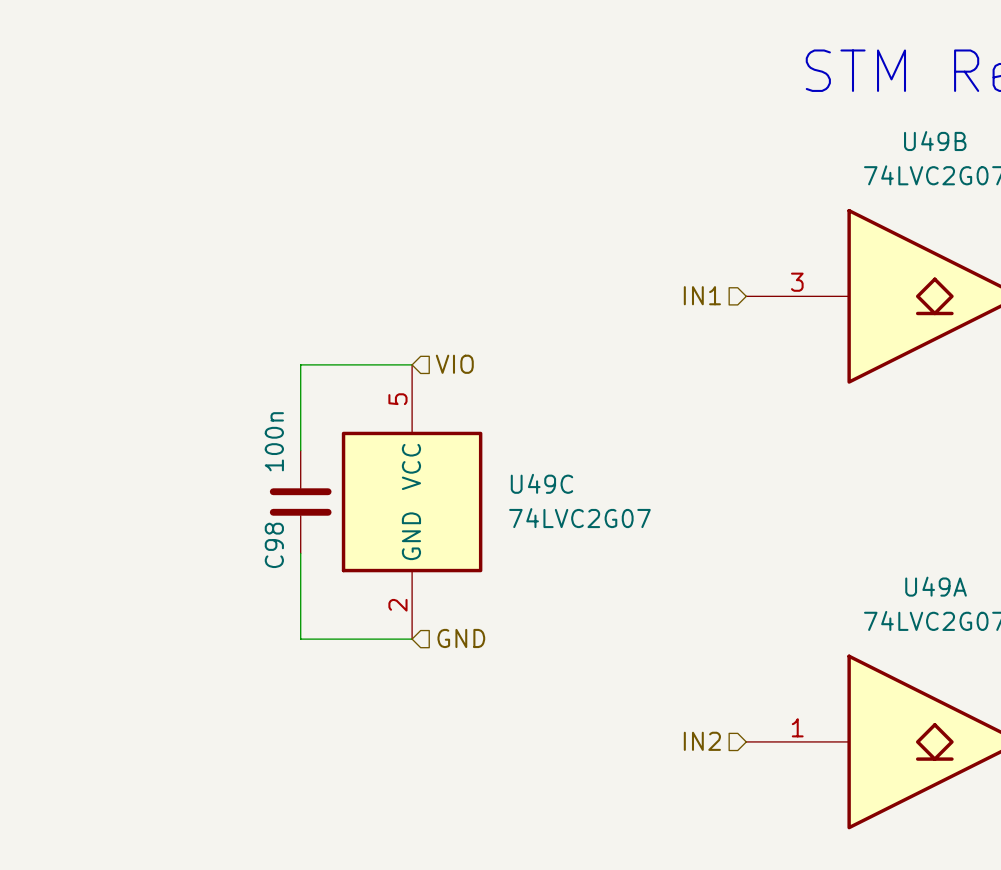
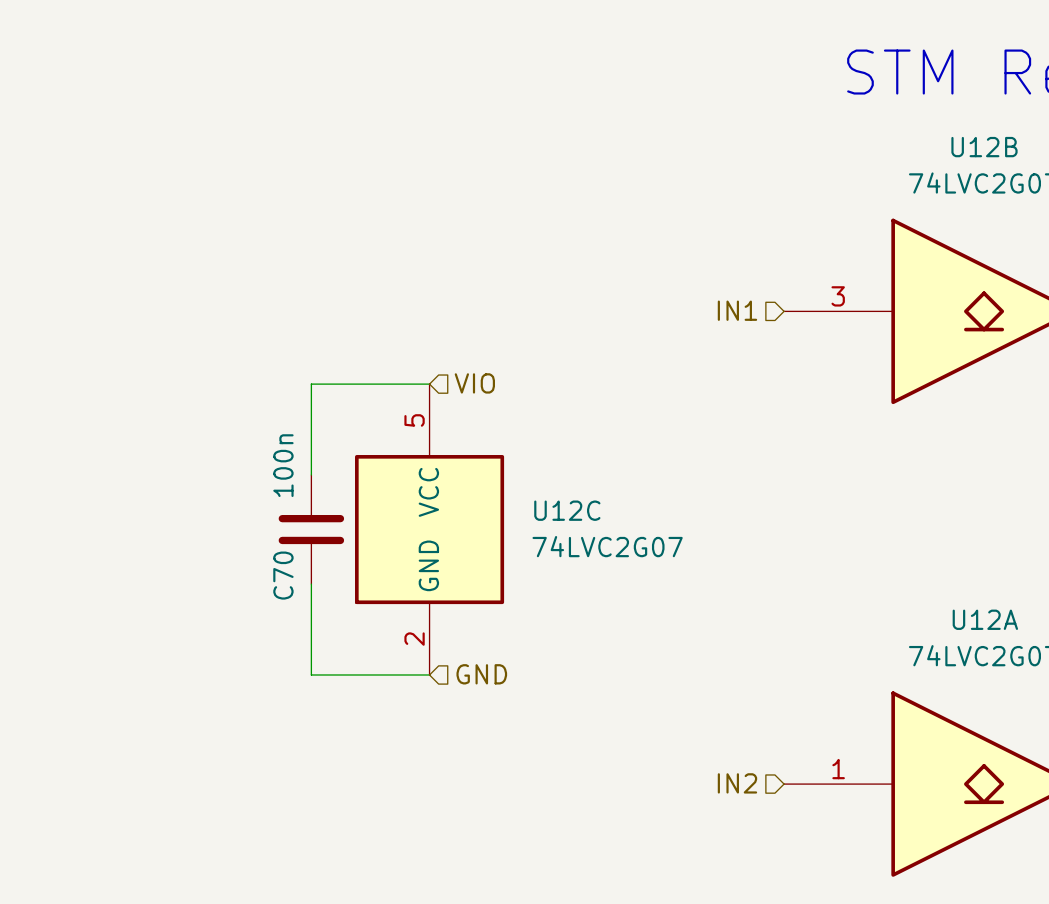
U49B name: U49B (935, 141) -> U12B (984, 147)
U49C name: U49C (541, 483) -> U12C (567, 510)
C98 name: C98 (274, 545) -> C70 (283, 575)
U49A name: U49A (936, 586) -> U12A (985, 619)

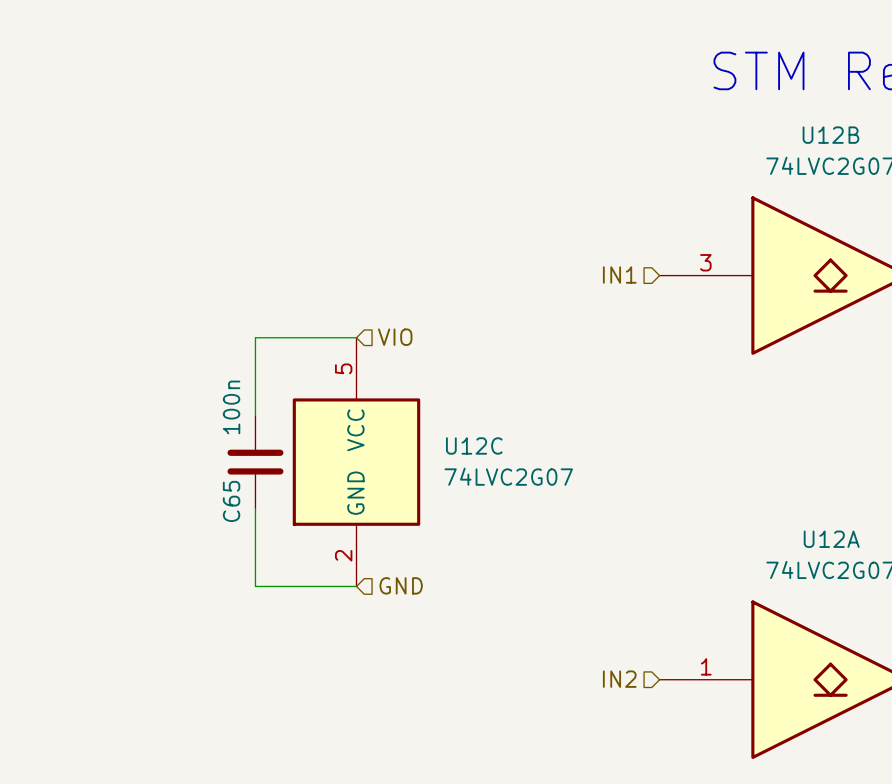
C70 name: C70 (283, 575) -> C65 (231, 501)

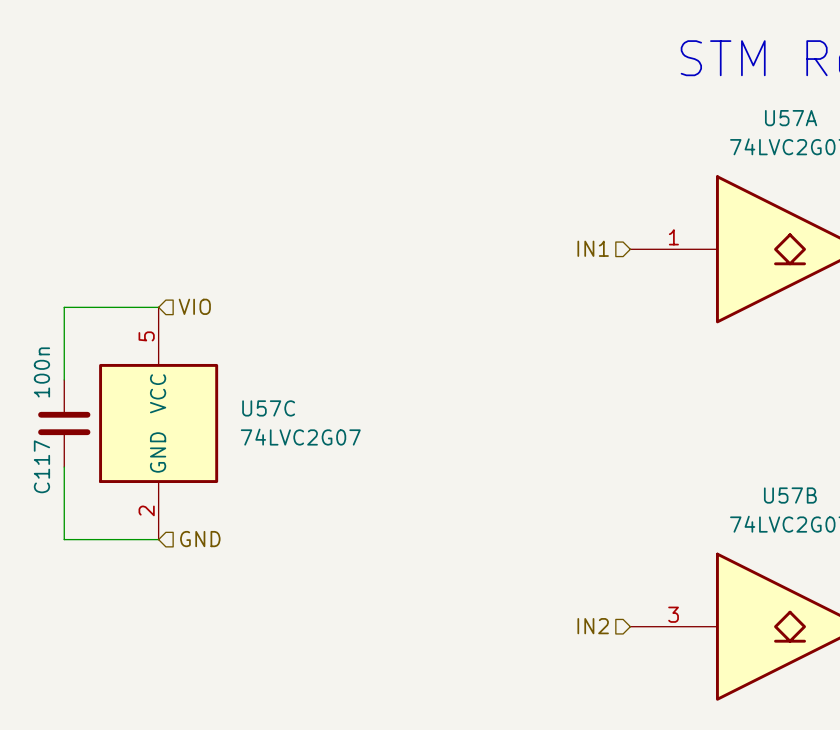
U12B name: U12B (830, 135) -> U57A (791, 118)
U12B pin number: 3 (705, 262) -> 1 (673, 237)
wire: (356, 337) (255, 337) (255, 415) -> (158, 307) (64, 307) (64, 379)
hierarchical label position: VIO (395, 337) -> VIO (194, 306)
C117: none -> 100n (64, 423)
U57C: none -> 74LVC2G07 (158, 423)
C65: 100n (255, 462) -> none
U12C: 74LVC2G07 (356, 462) -> none
wire: (255, 508) (255, 586) (356, 586) -> (64, 467) (64, 539) (158, 539)
U12A name: U12A (831, 539) -> U57B (790, 495)
hierarchical label position: GND (401, 585) -> GND (200, 539)
U12A pin number: 1 (706, 666) -> 3 (673, 614)

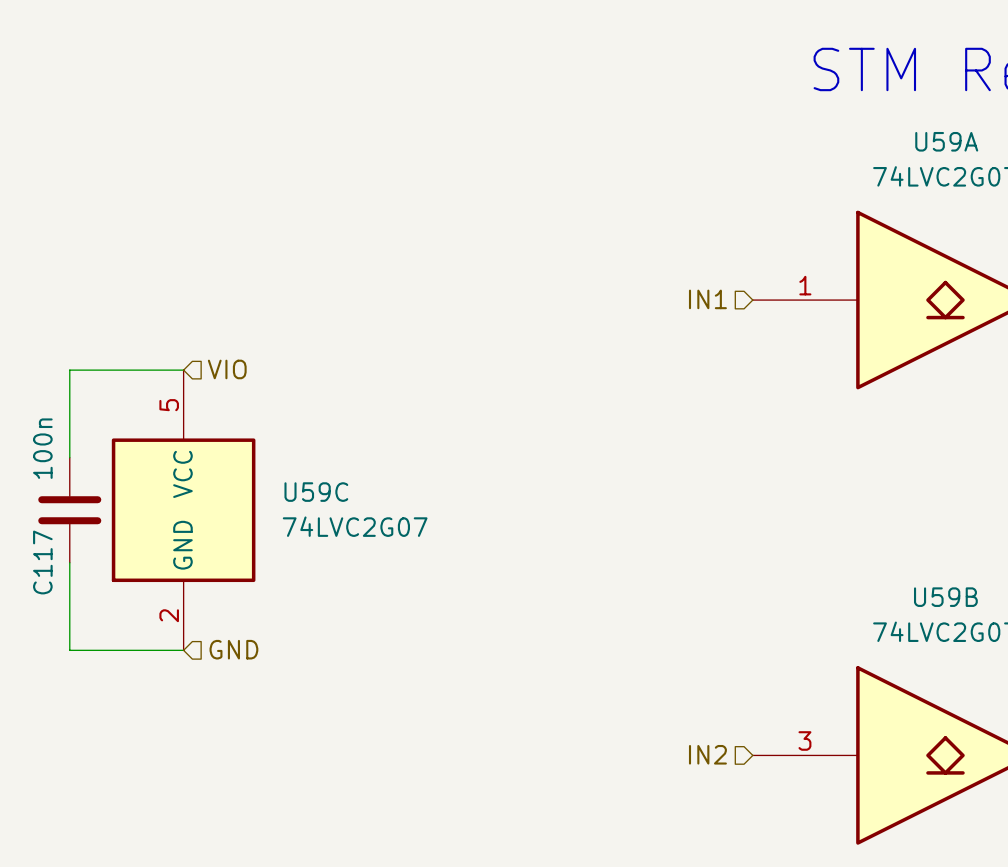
U57A name: U57A (791, 118) -> U59A (946, 141)
U57C name: U57C (268, 408) -> U59C (316, 492)
U57B name: U57B (790, 495) -> U59B (945, 597)

